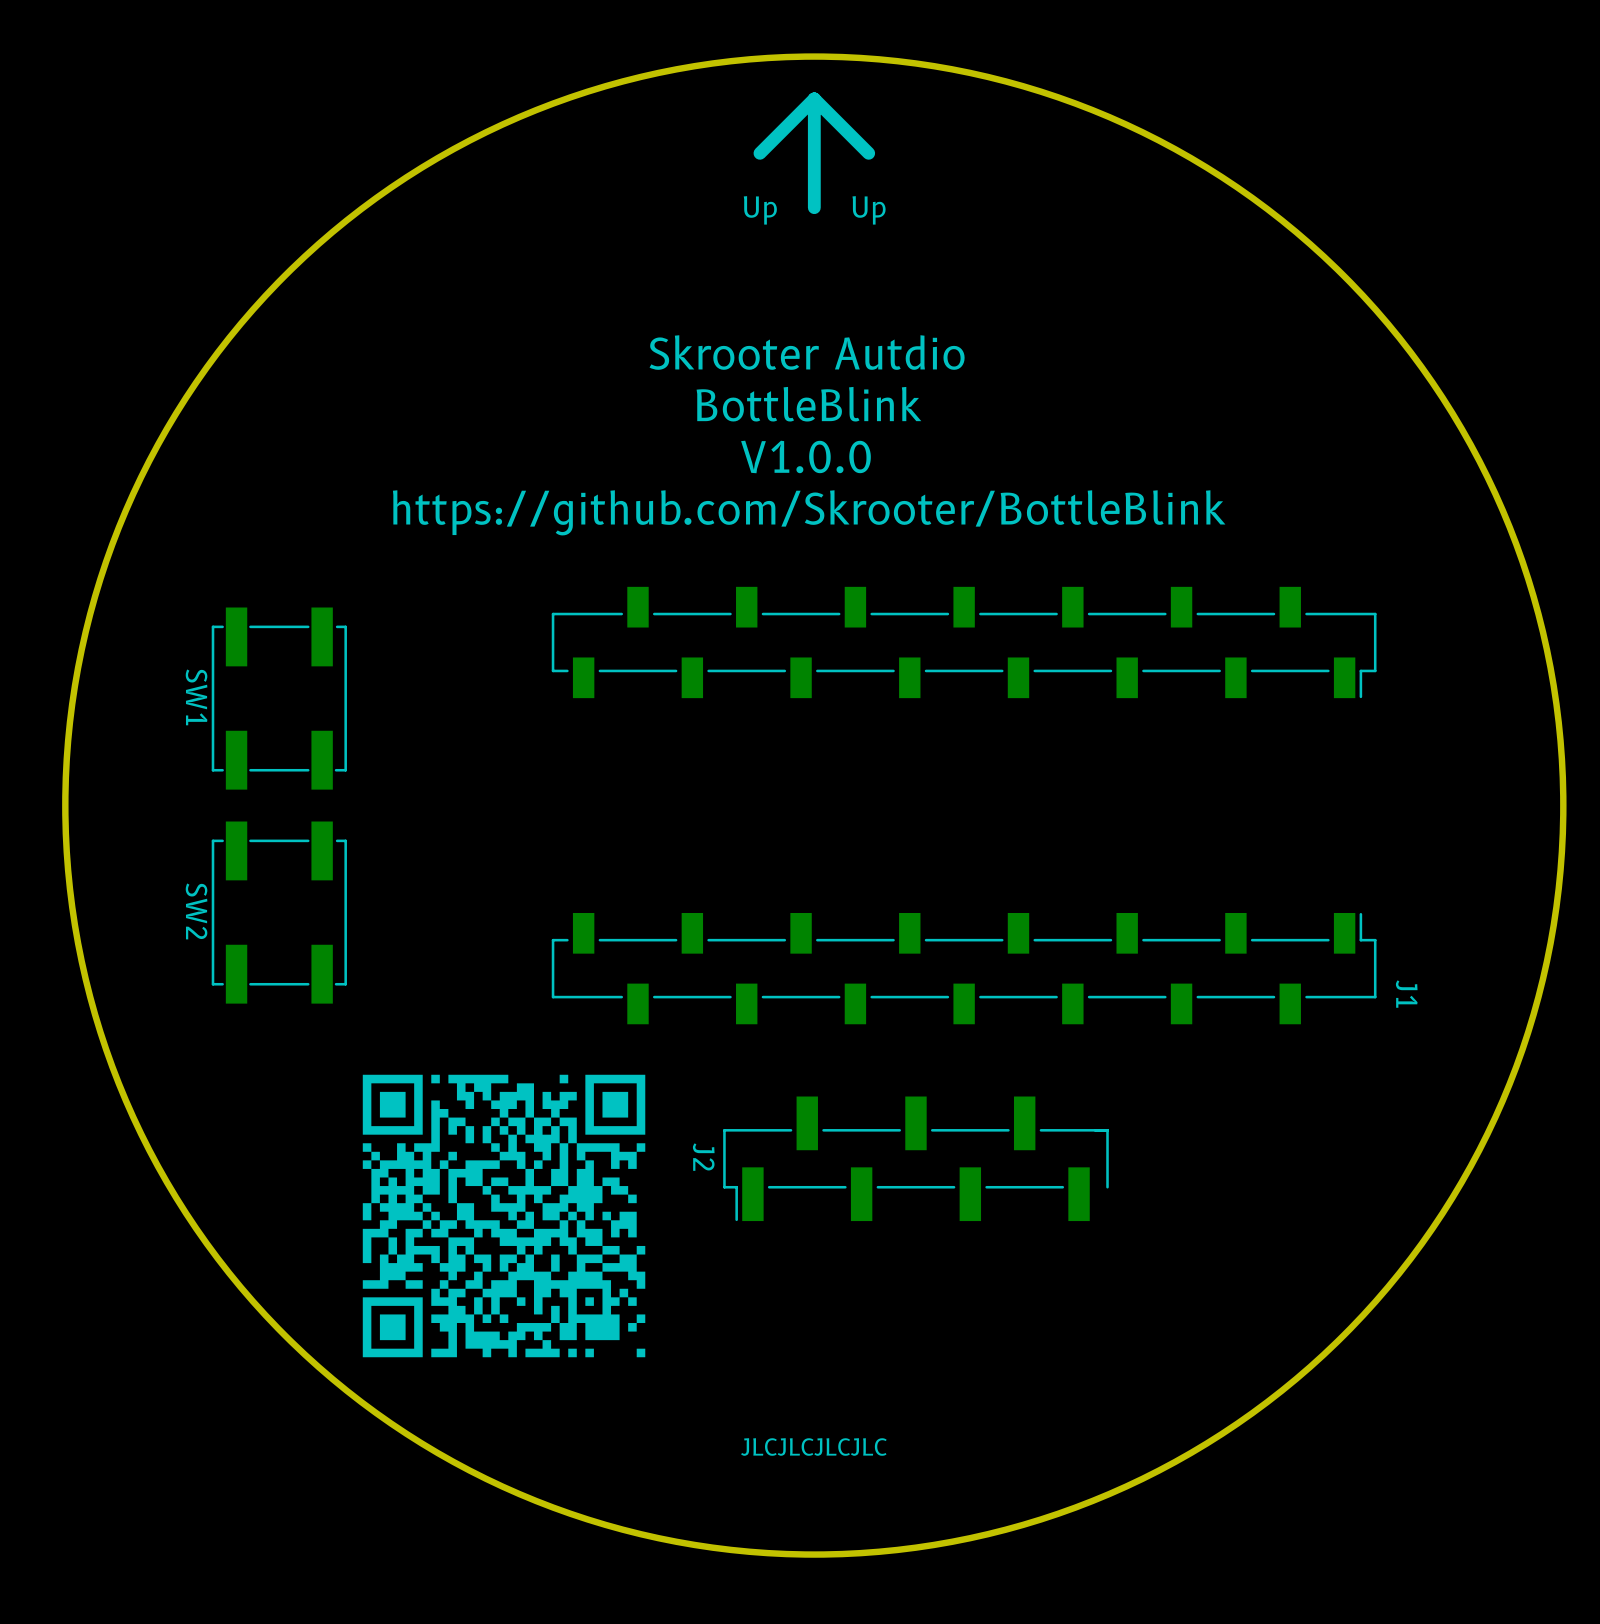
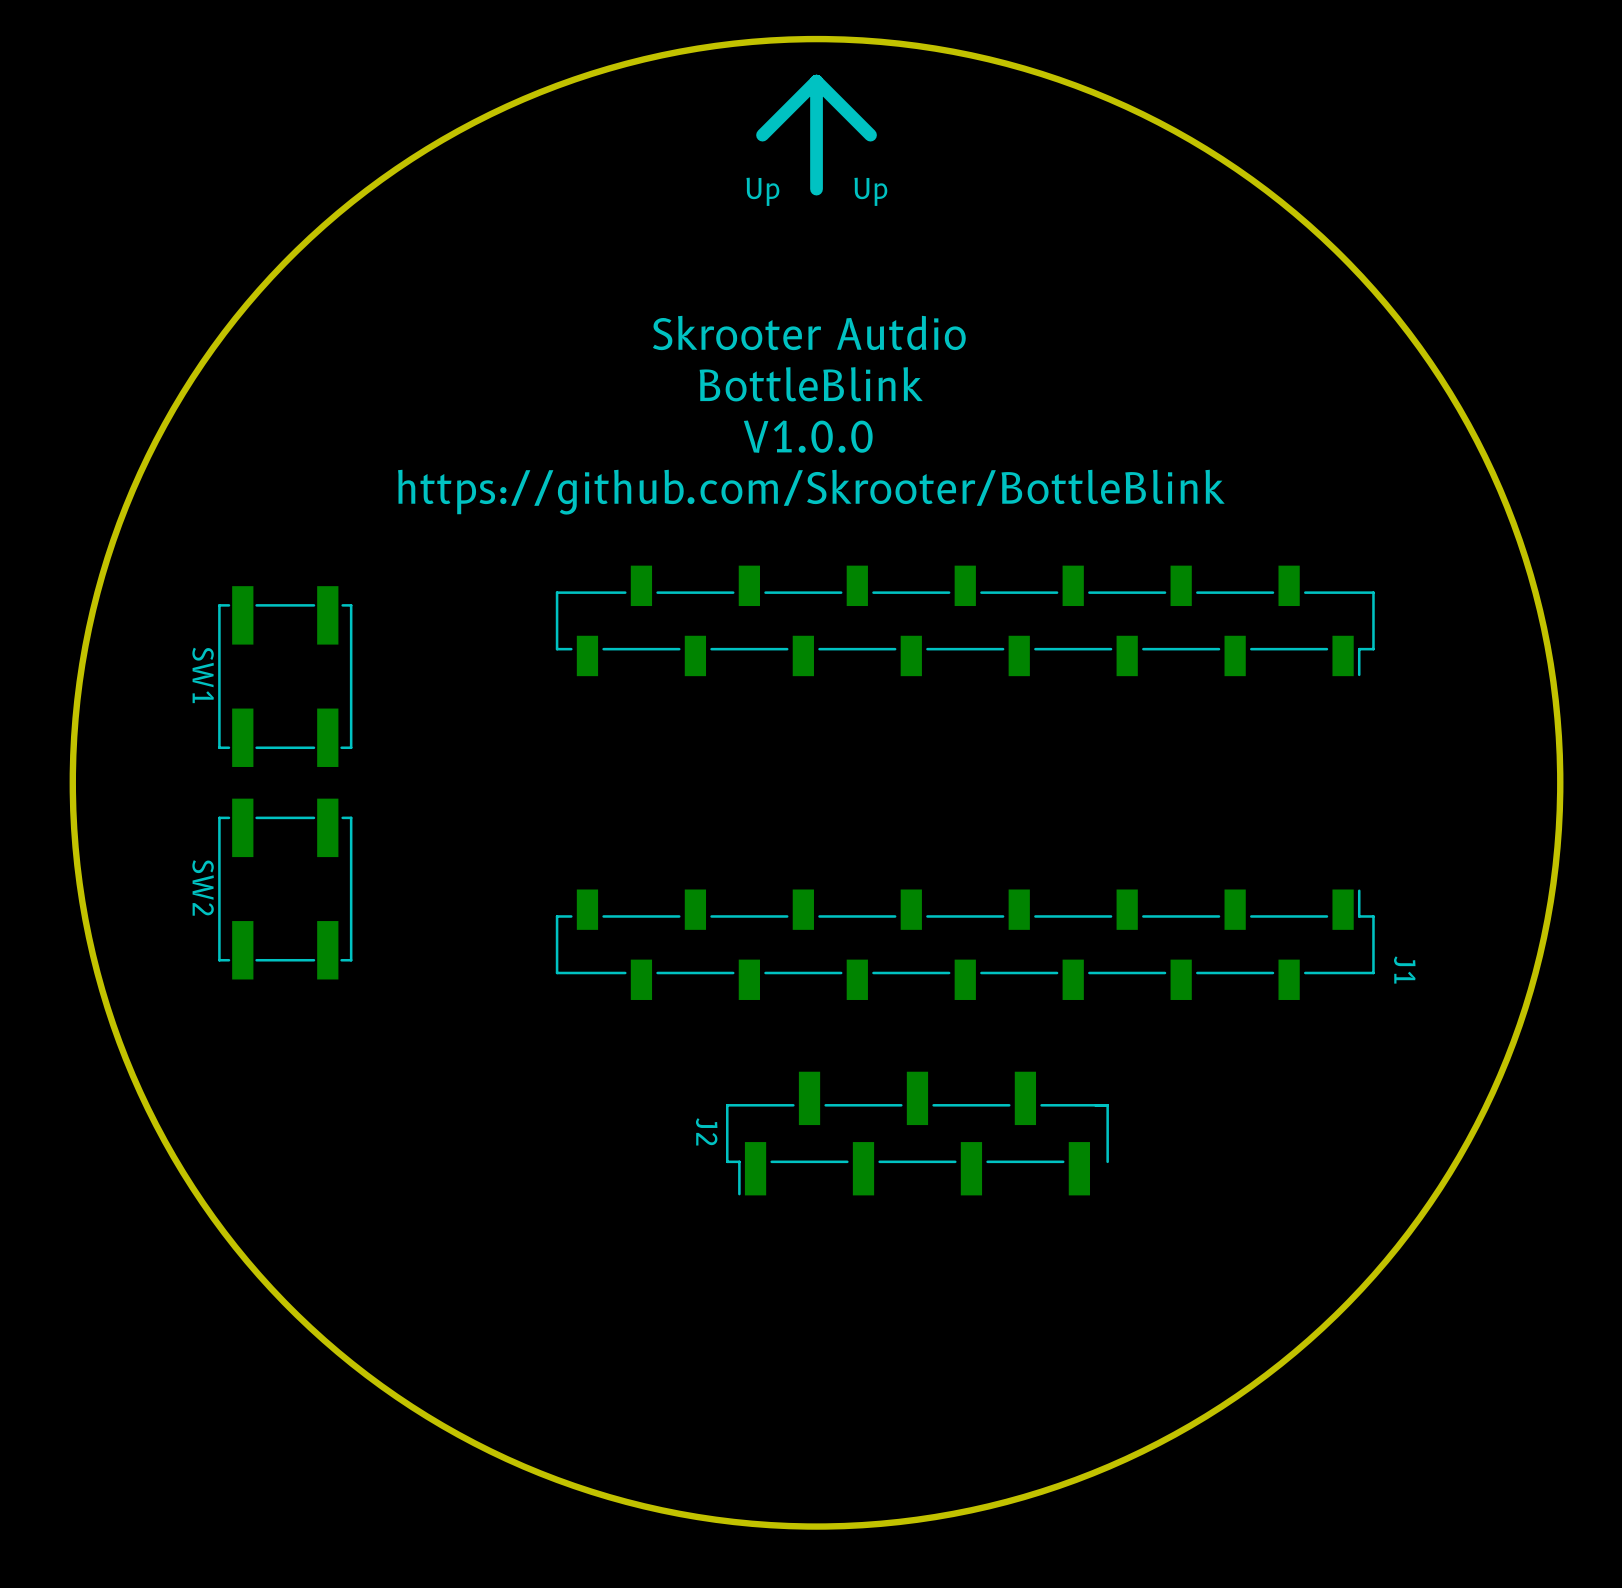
drawing: [362, 1074, 646, 1358] -> none
text: JLCJLCJLCJLC (813, 1447) -> none

